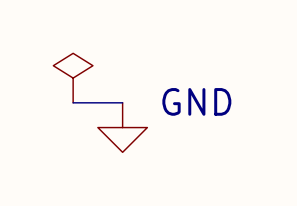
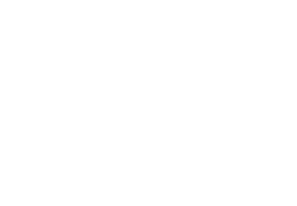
power symbol: (73, 78) -> none
wire: (73, 102) (122, 102) -> none
power symbol: GND (122, 127) -> none

